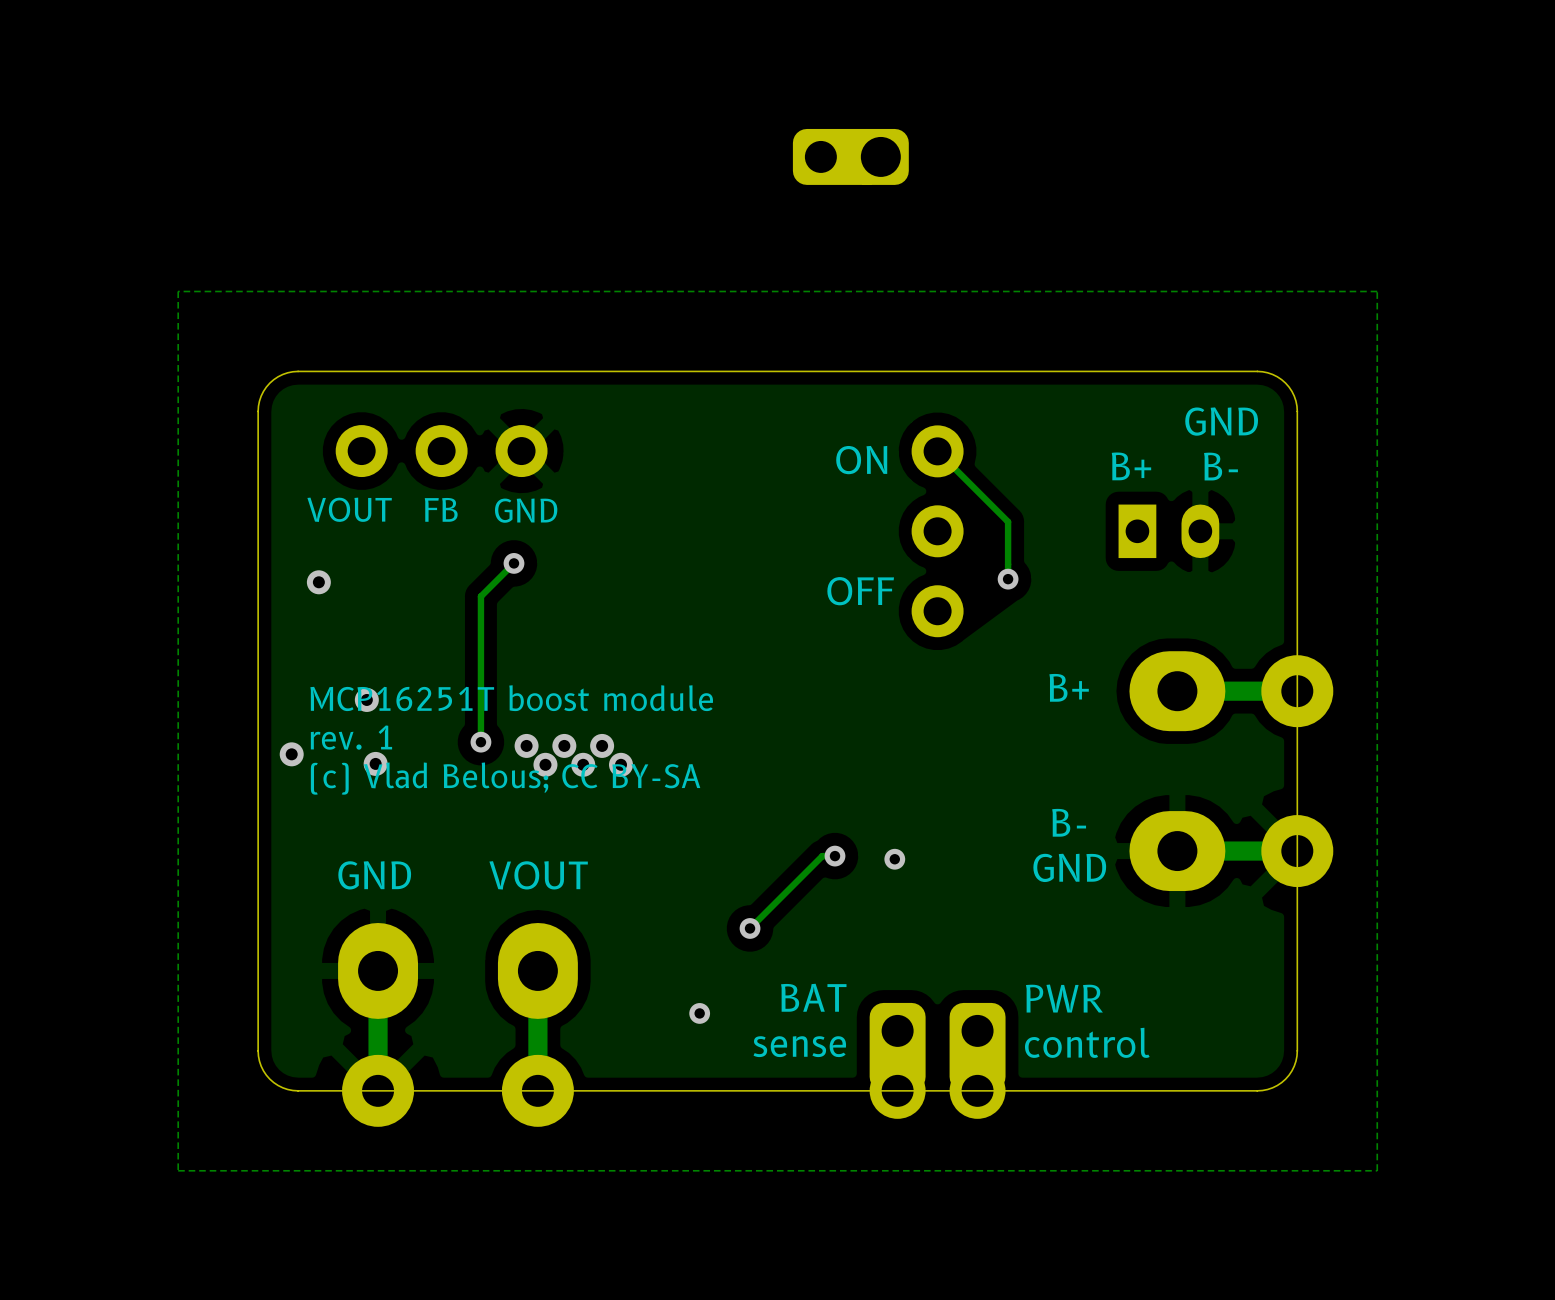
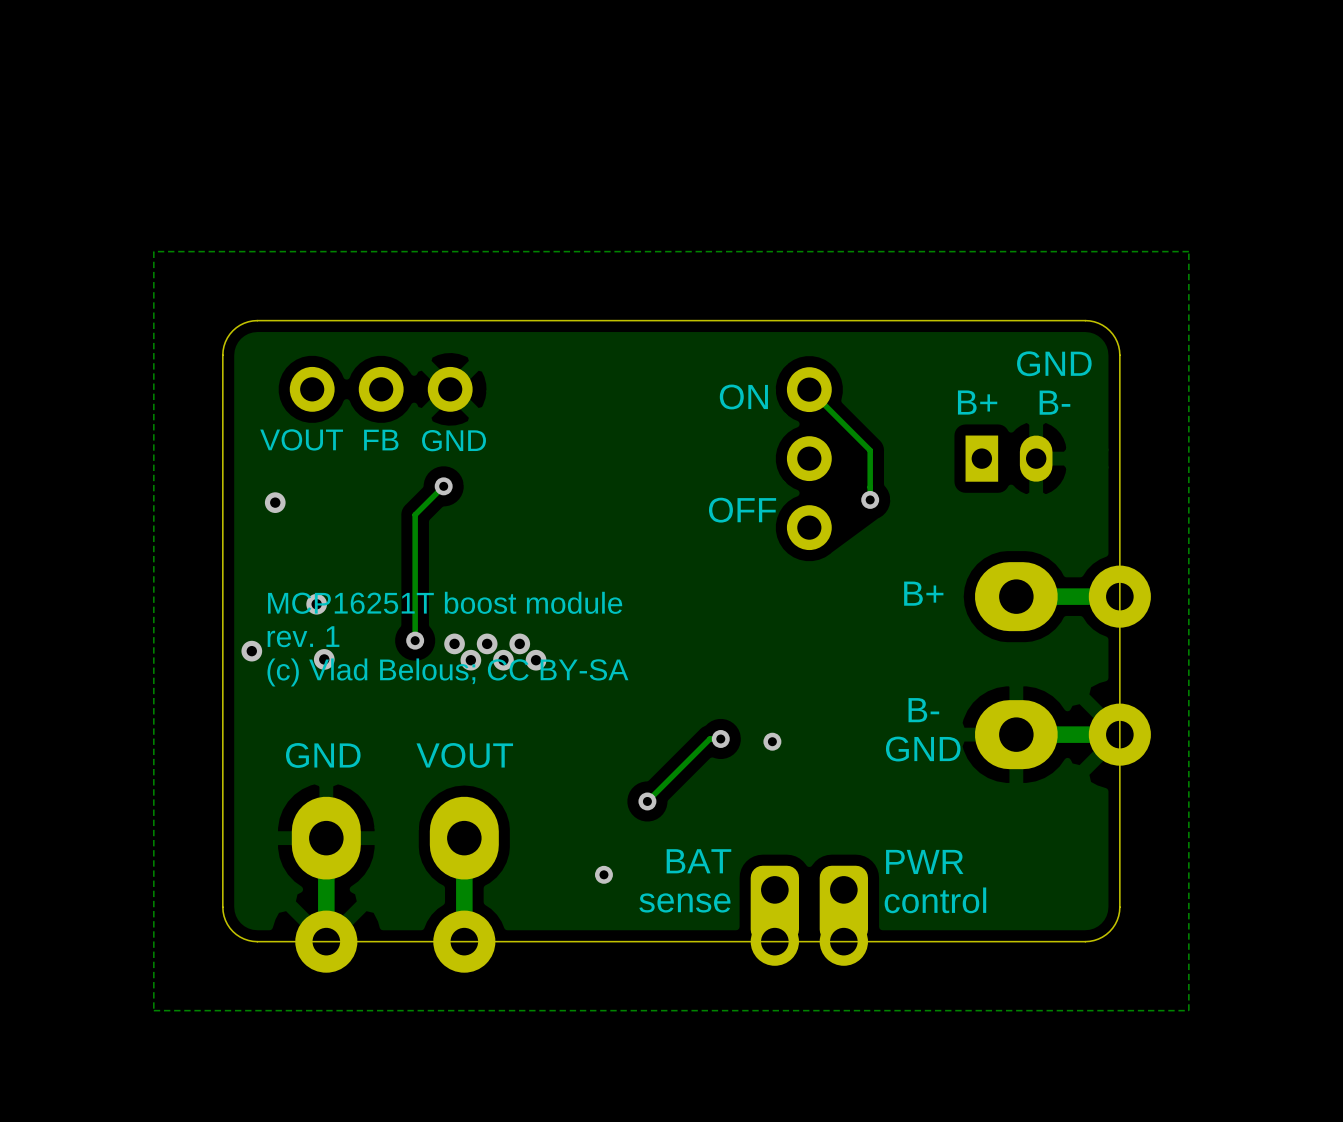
part: (850, 156) -> none

